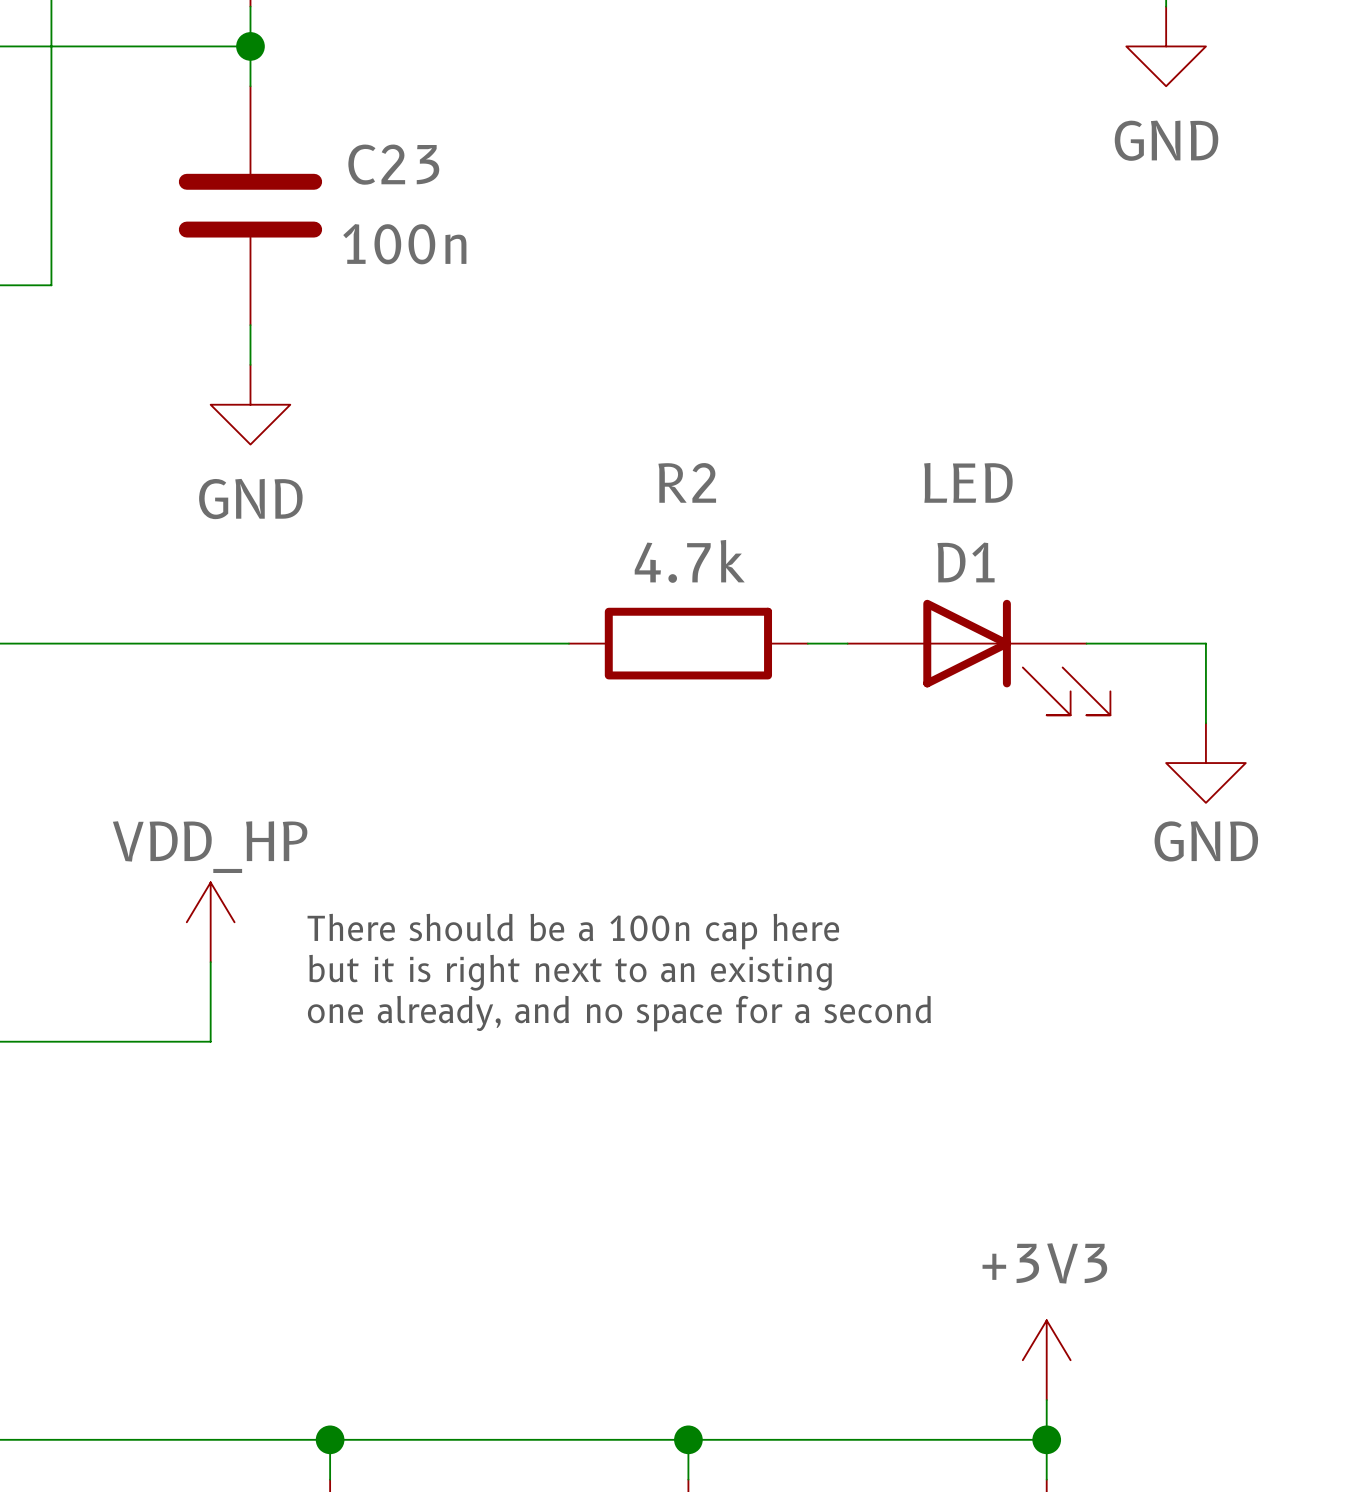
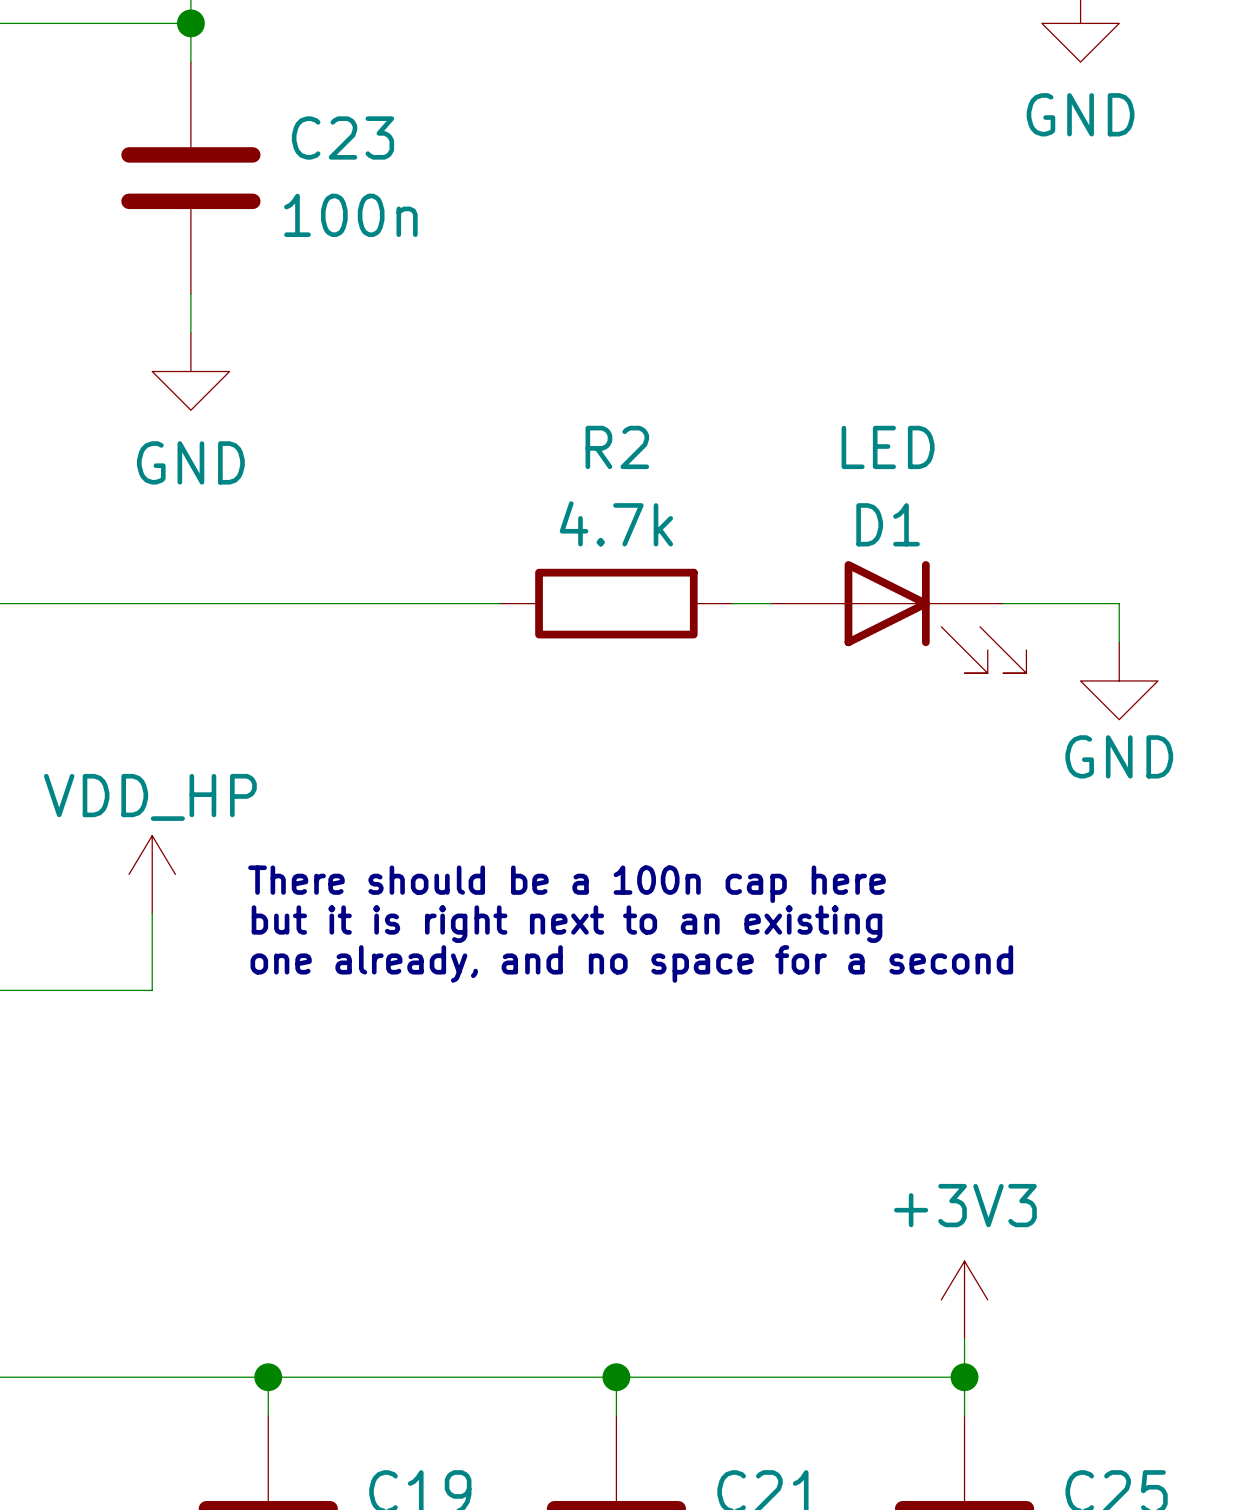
power symbol position: GND (1205, 763) -> GND (1119, 680)

